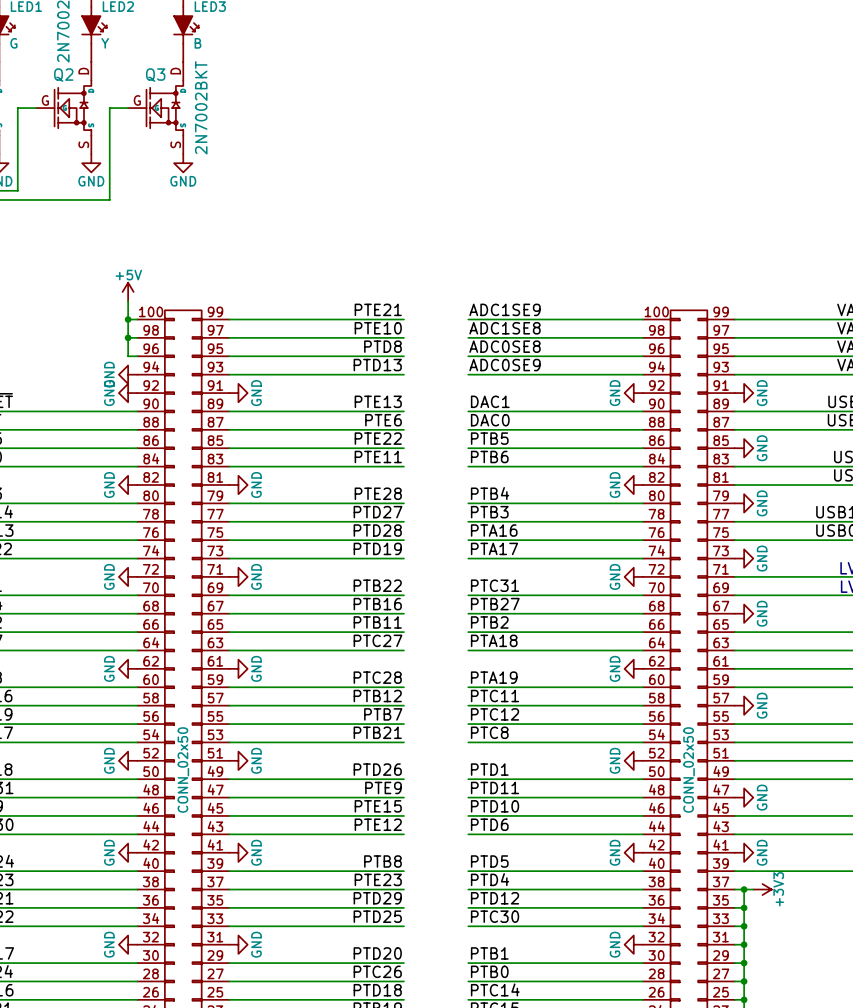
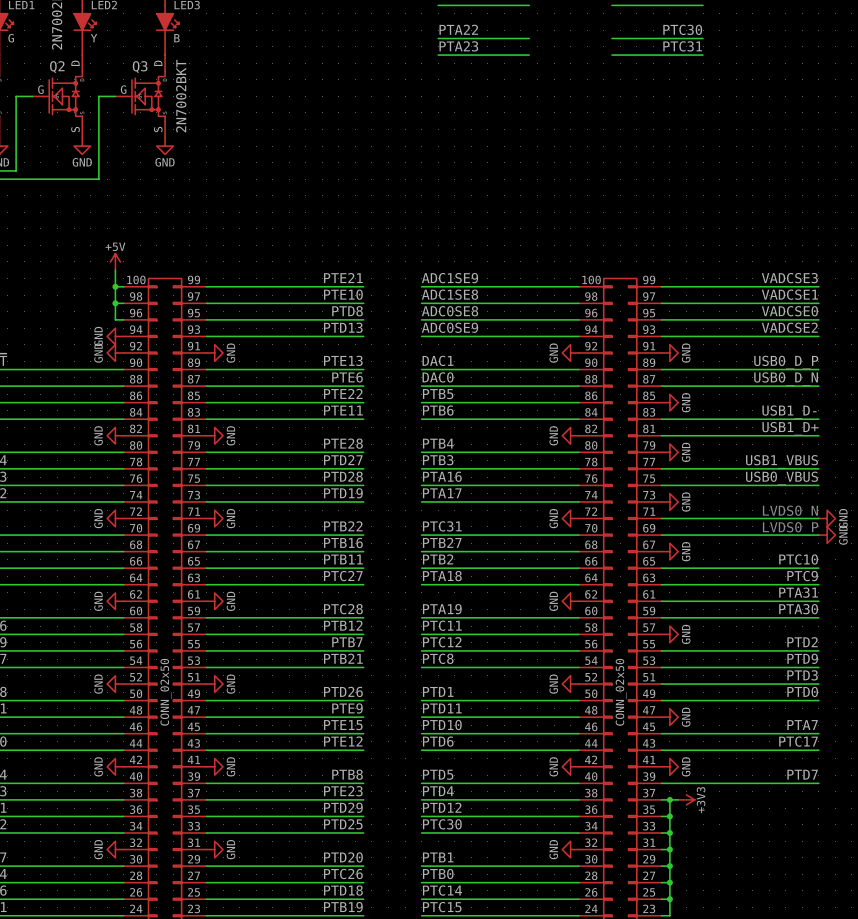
wire: none -> (438, 5) (529, 5)
wire: none -> (611, 5) (703, 5)
label: none -> PTA22 (458, 29)
label: none -> PTC30 (682, 29)
wire: none -> (438, 38) (529, 38)
wire: none -> (611, 38) (703, 38)
label: none -> PTA23 (458, 46)
label: none -> PTC31 (682, 46)
wire: none -> (438, 55) (529, 55)
wire: none -> (611, 55) (703, 55)

